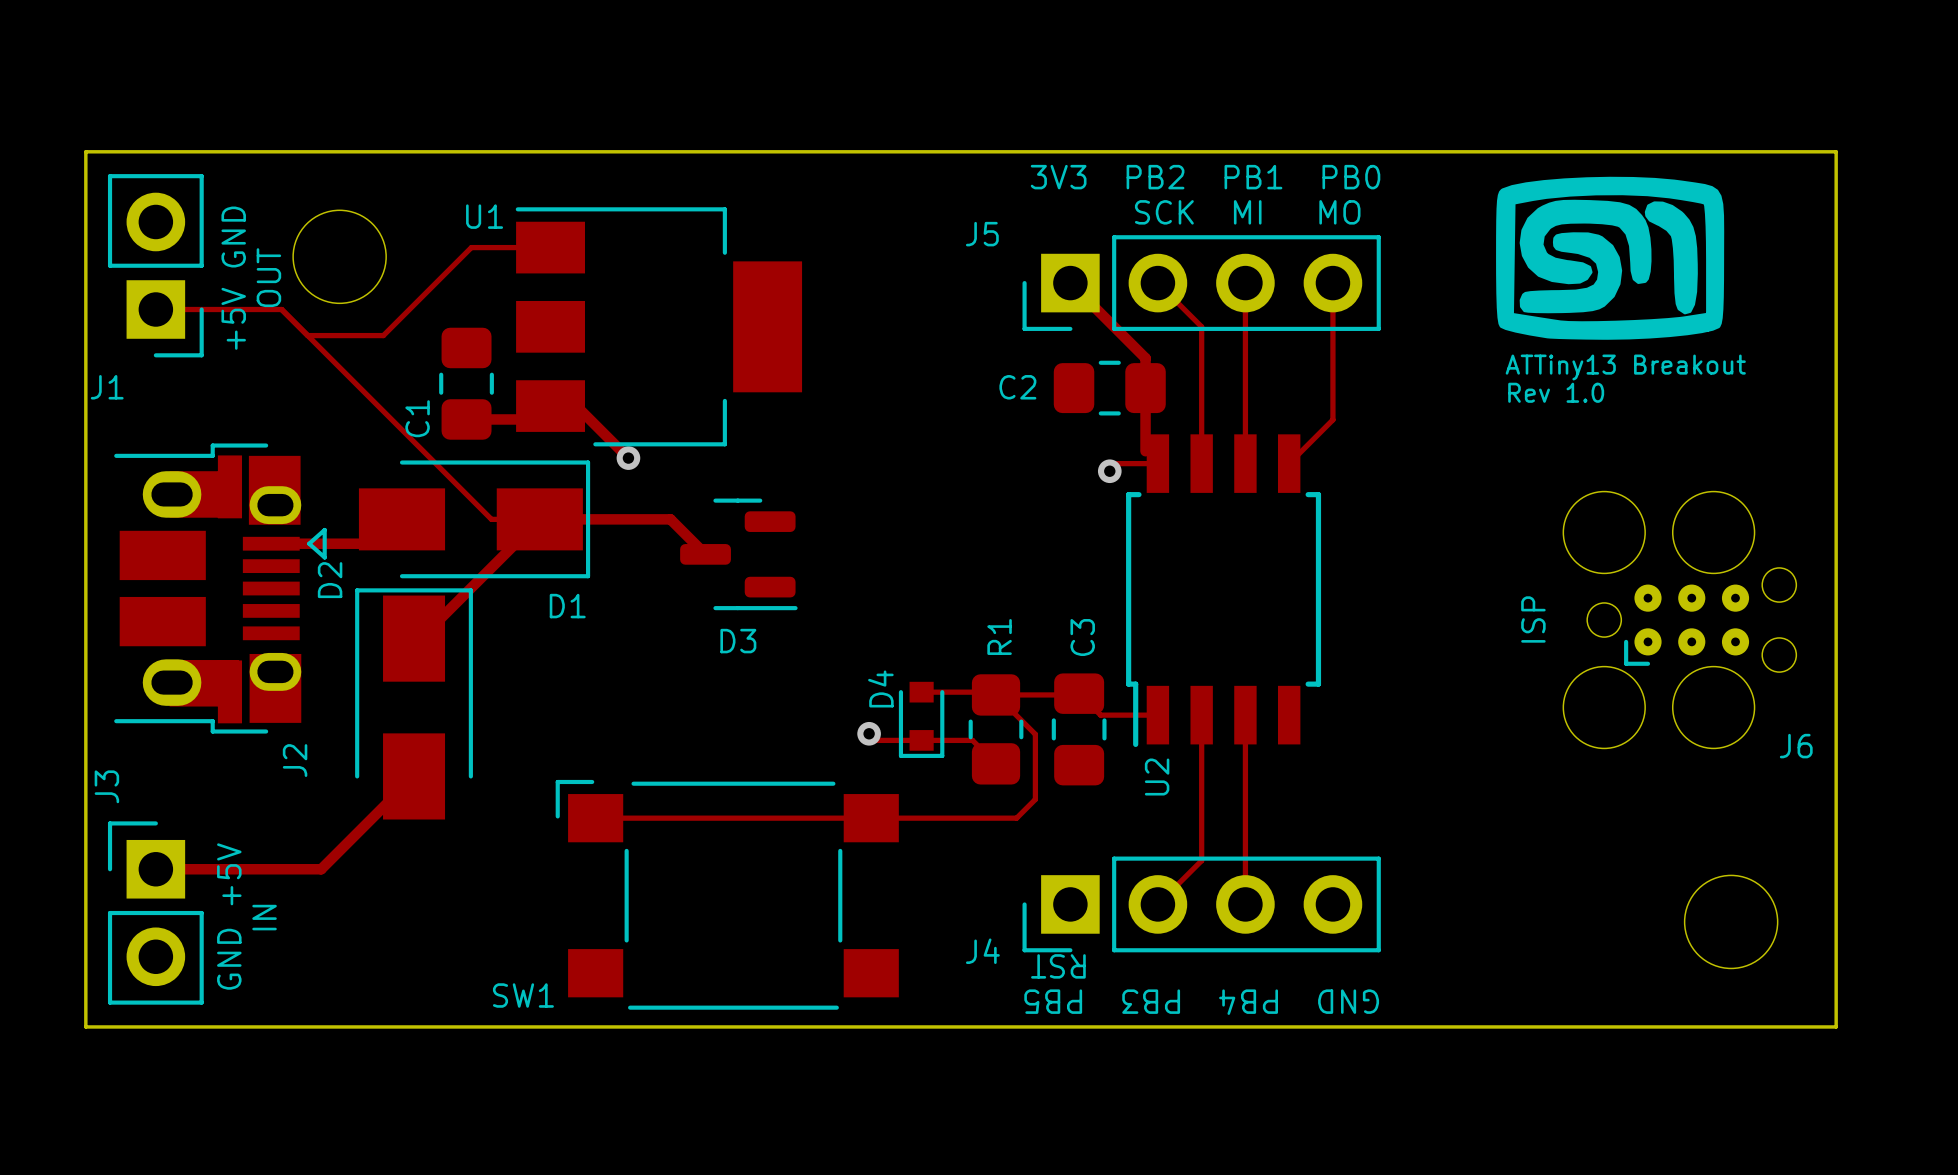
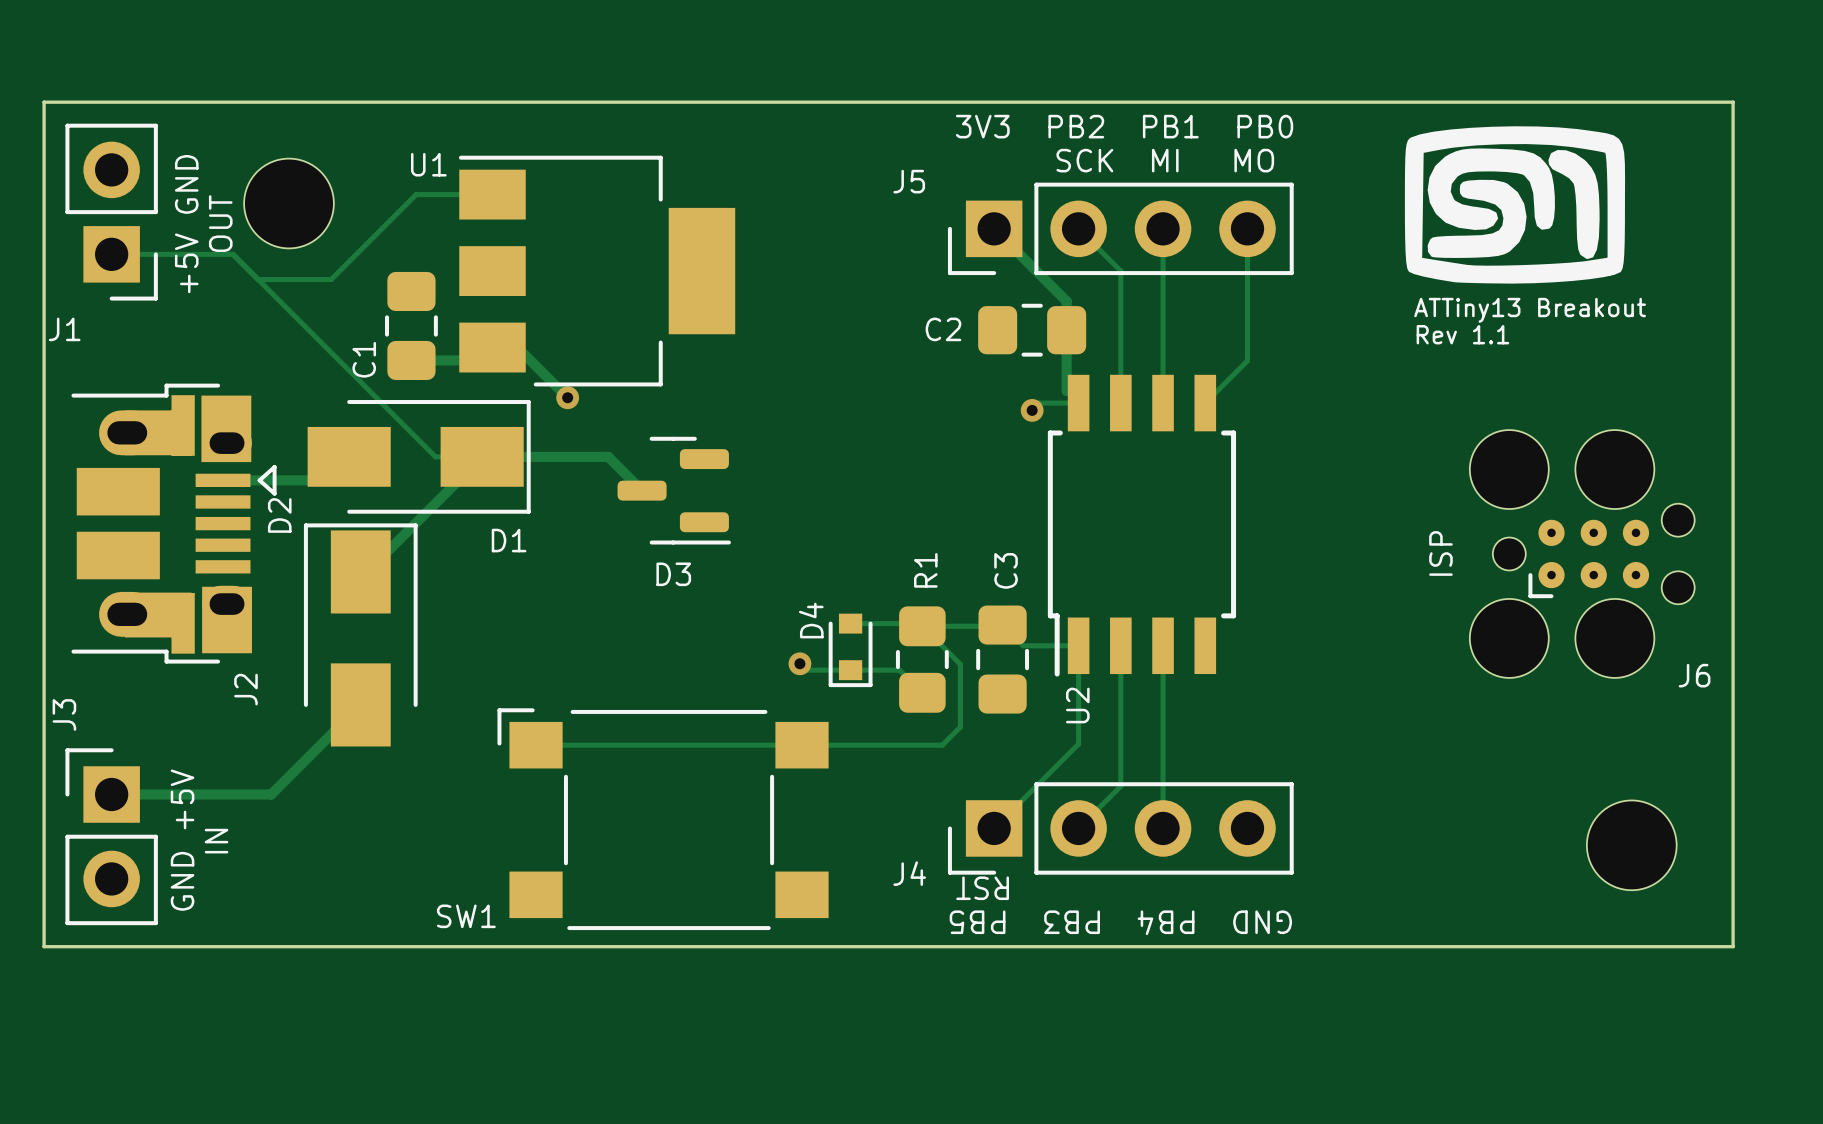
text: Rev 1.0 (1556, 392) -> Rev 1.1 (1462, 334)
track: none -> (1078, 645) (1078, 744) (994, 828)

